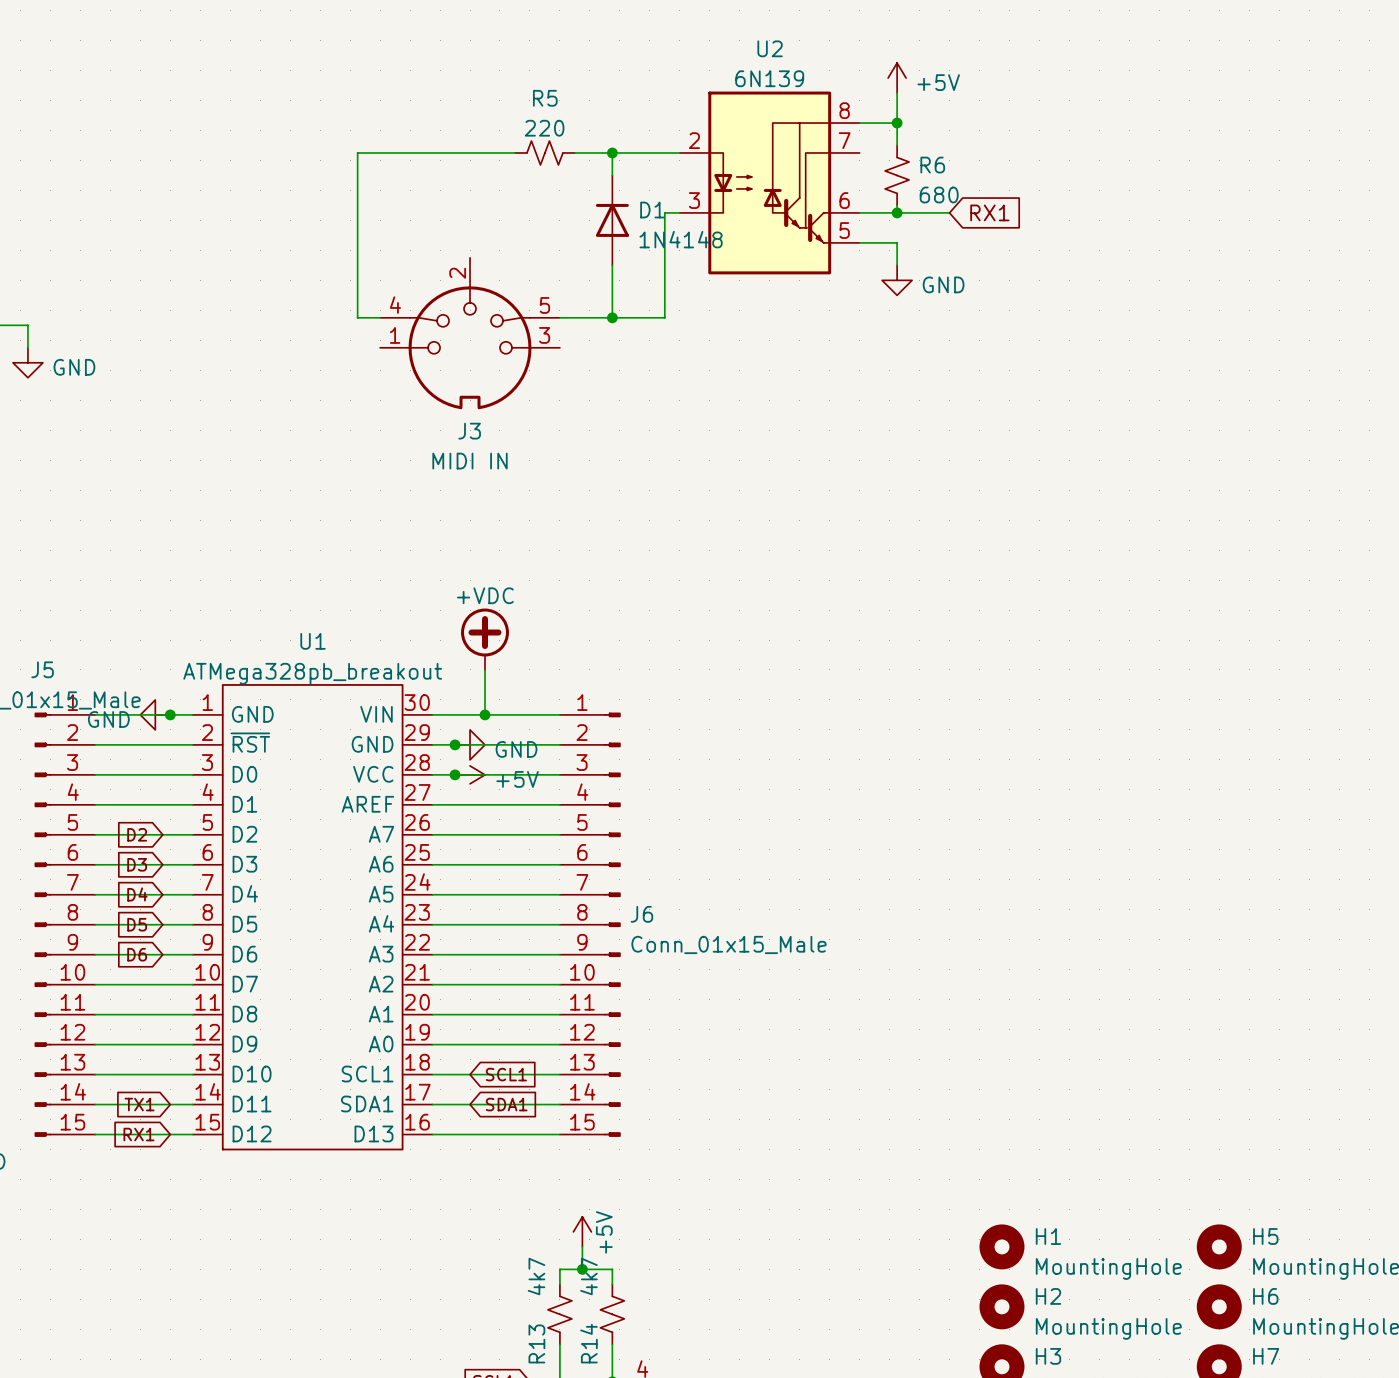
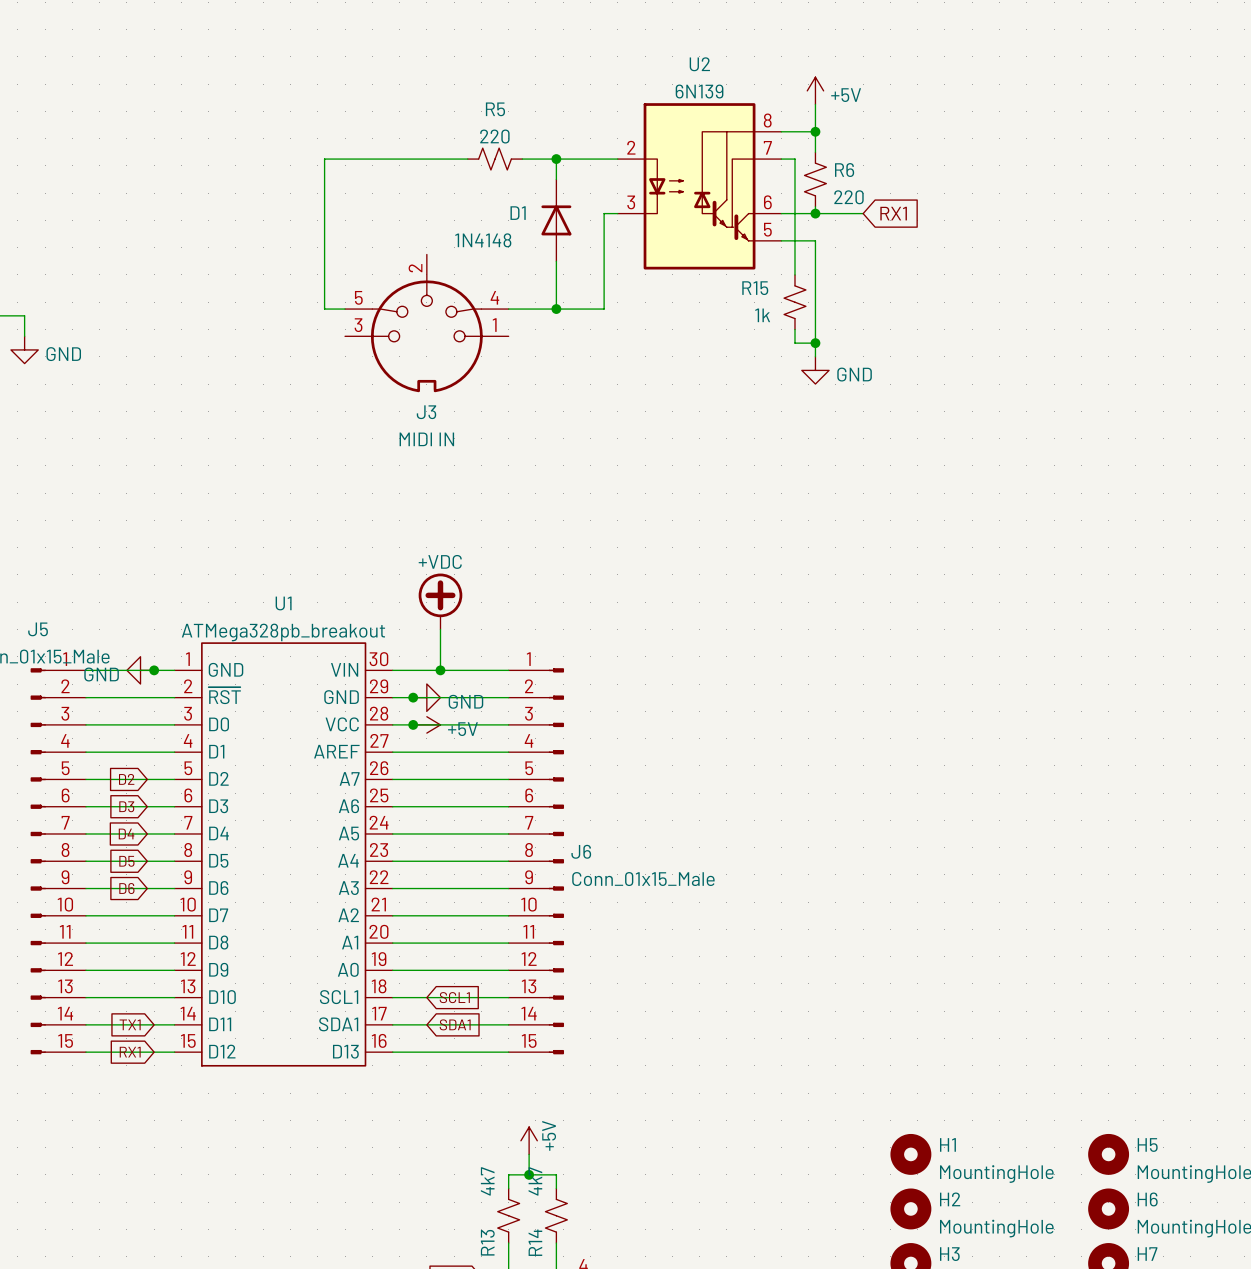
wire: none -> (781, 159) (794, 159) (794, 274)
R6 value: 680 (939, 194) -> 220 (848, 197)
D1 name position: D1 (652, 210) -> D1 (518, 213)
D1 value position: 1N4148 (681, 239) -> 1N4148 (483, 240)
wire: none -> (815, 261) (815, 356)
power symbol position: GND (897, 280) -> GND (815, 370)
R15: none -> 1k (794, 302)
wire: none -> (794, 329) (794, 343) (815, 343)
J3 flip: as is (470, 347) -> left-right (426, 336)
junction: none -> (815, 343)

